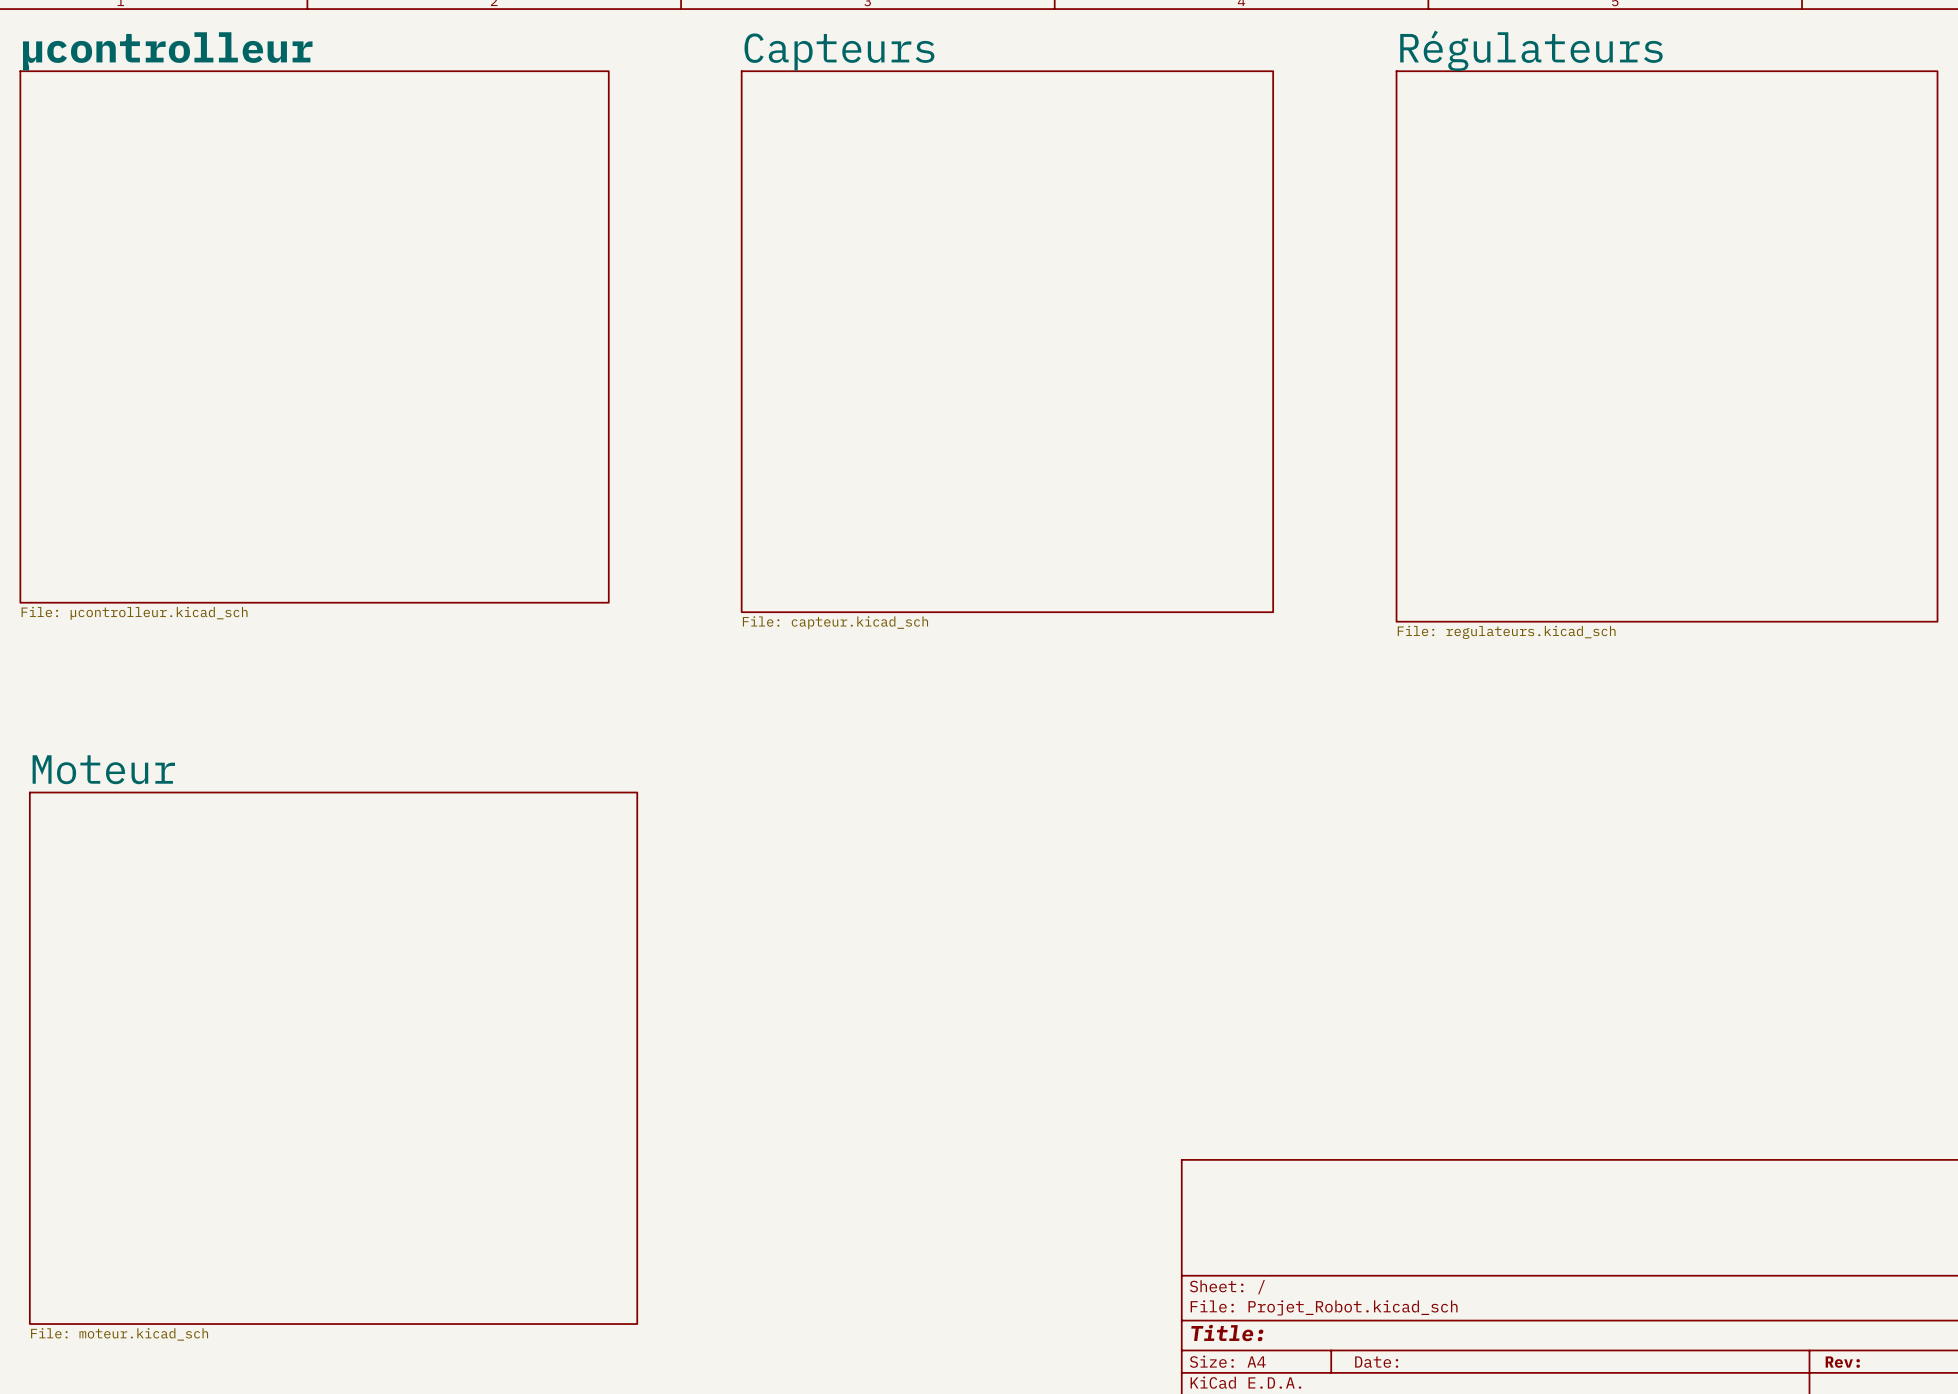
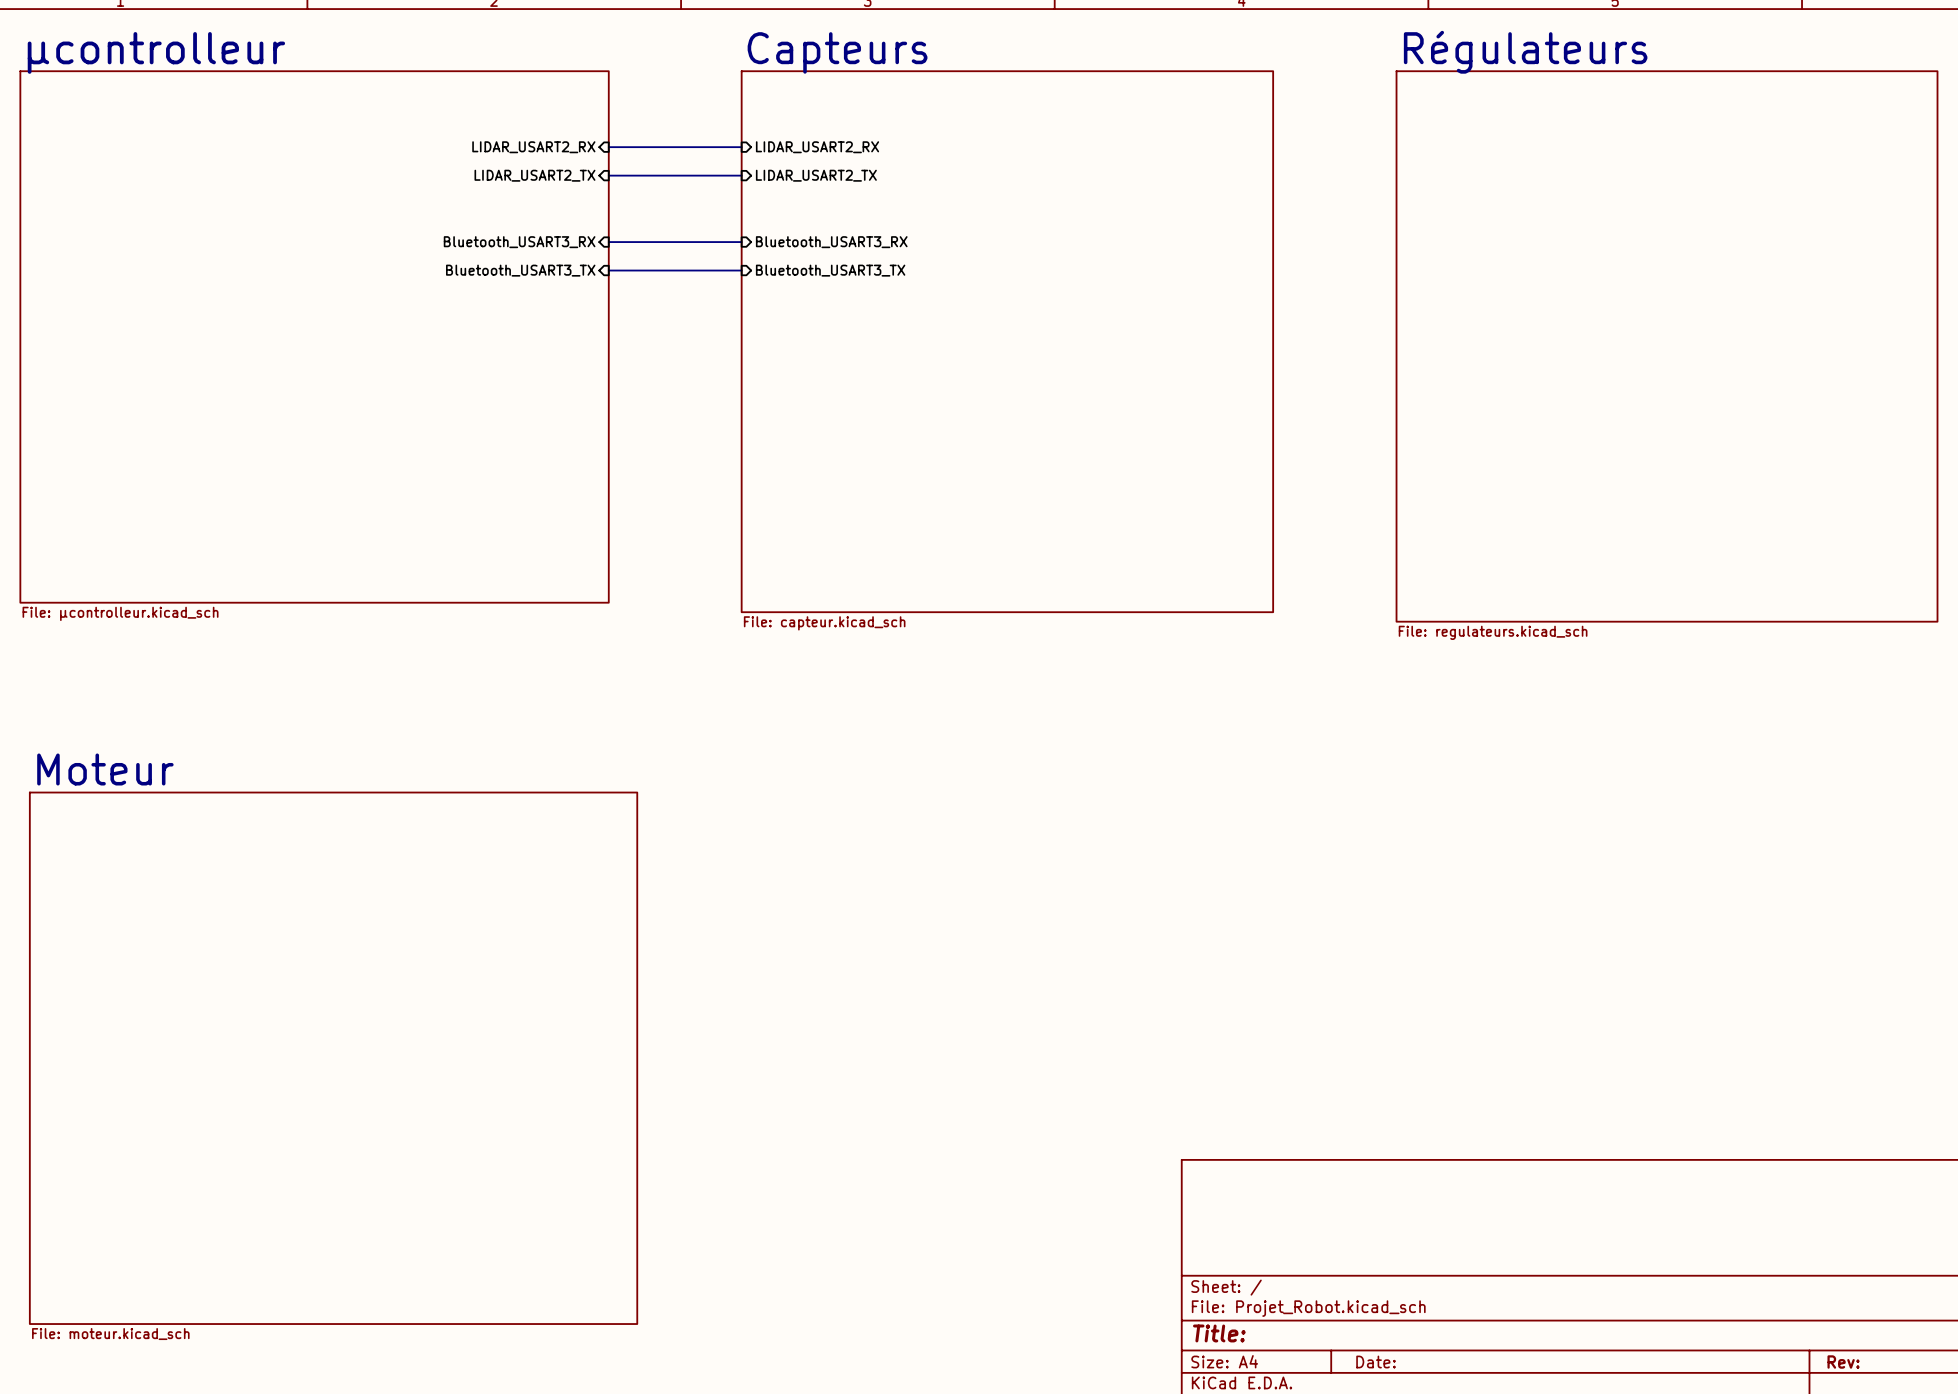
sheet pin: none -> LIDAR_USART2_RX (533, 147)
wire: none -> (608, 147) (741, 147)
sheet pin: none -> LIDAR_USART2_RX (817, 147)
wire: none -> (608, 175) (741, 175)
sheet pin: none -> LIDAR_USART2_TX (534, 175)
sheet pin: none -> LIDAR_USART2_TX (816, 175)
sheet pin: none -> Bluetooth_USART3_RX (519, 242)
wire: none -> (608, 242) (741, 242)
sheet pin: none -> Bluetooth_USART3_RX (831, 242)
wire: none -> (608, 270) (741, 270)
sheet pin: none -> Bluetooth_USART3_TX (520, 270)
sheet pin: none -> Bluetooth_USART3_TX (830, 270)

